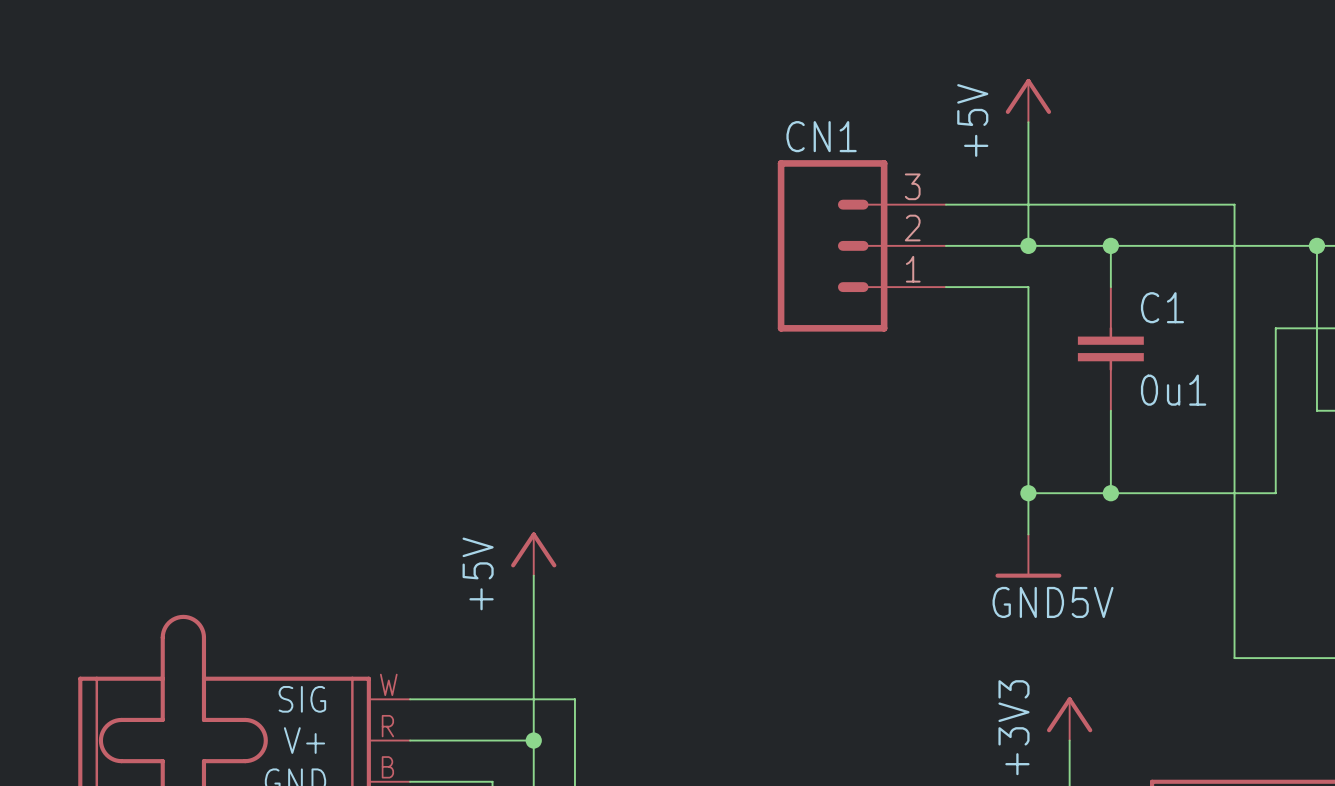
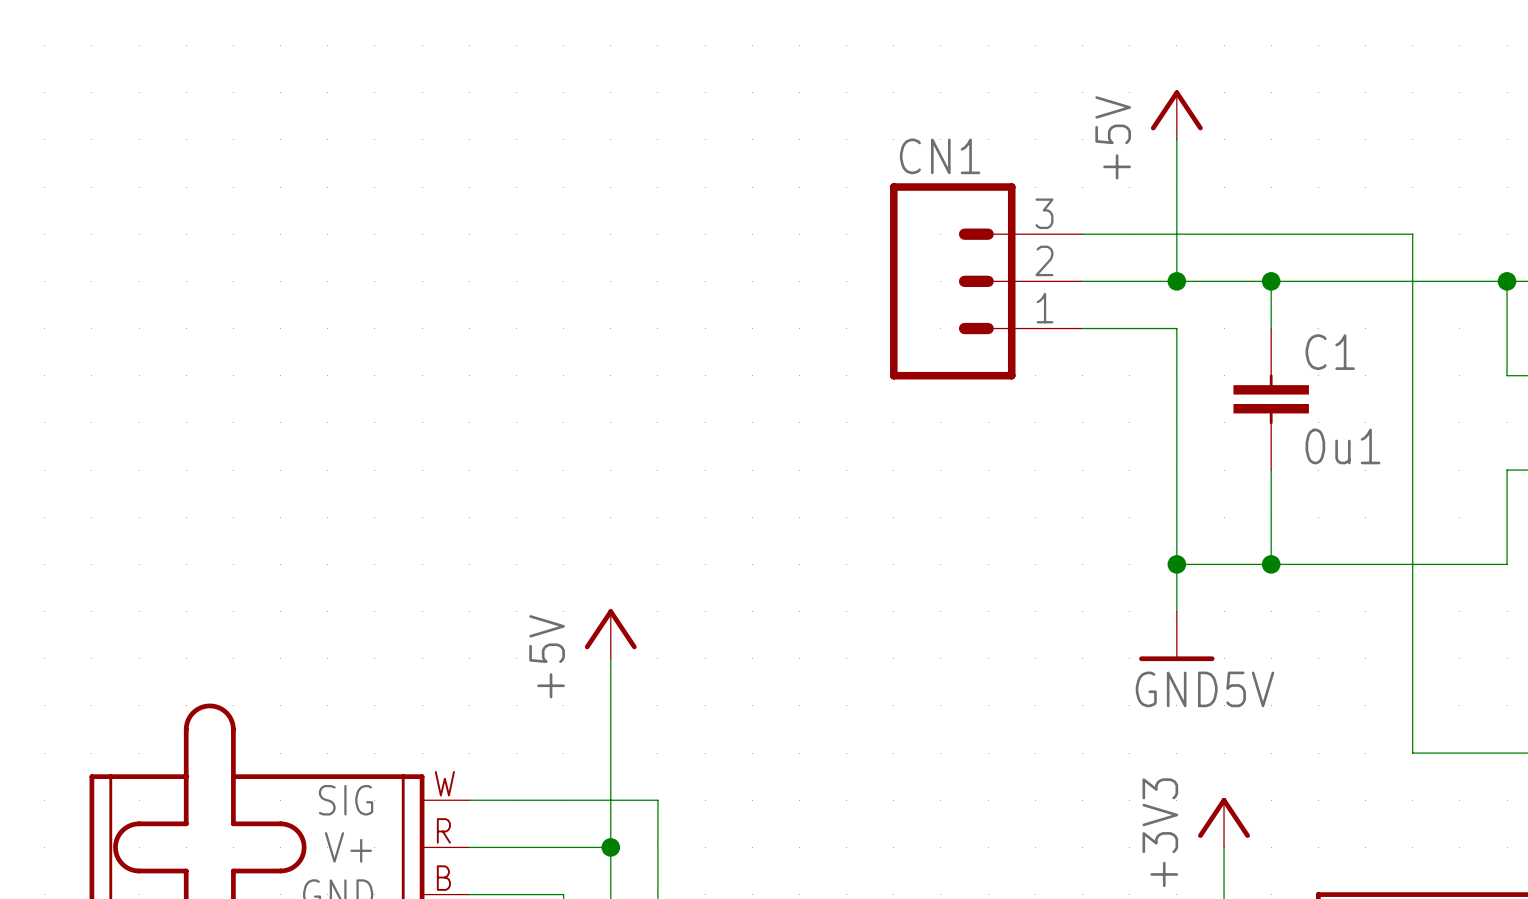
wire: (1316, 410) (1316, 328) (1275, 328) (1275, 493) -> (1507, 470) (1507, 564) (1459, 564)

